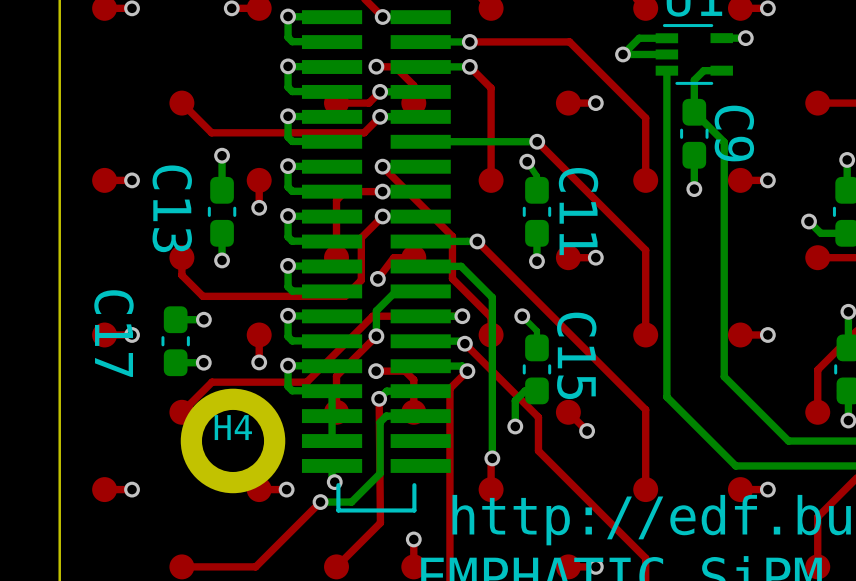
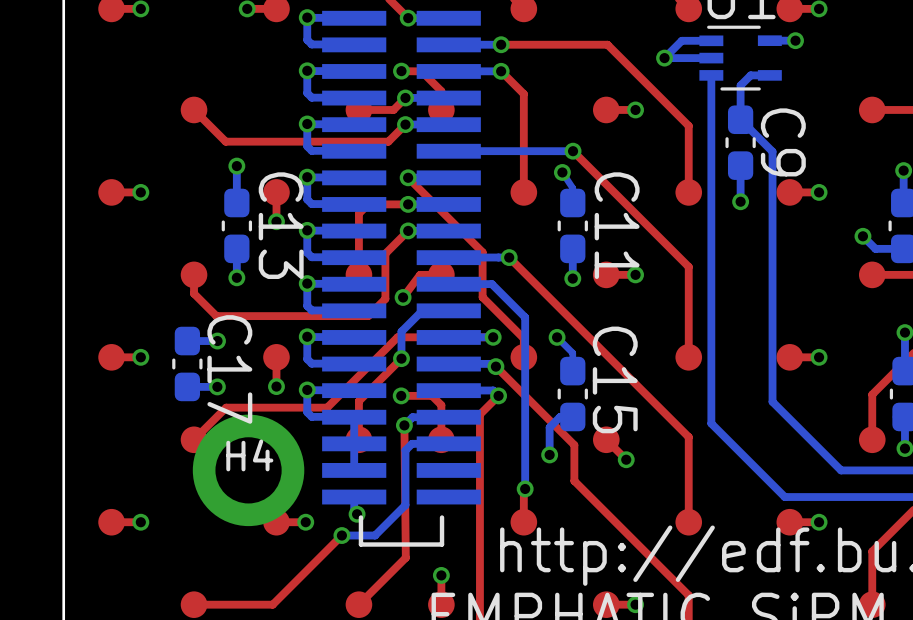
C13 name position: C13 (172, 208) -> C13 (281, 225)
C17 name position: C17 (113, 333) -> C17 (229, 369)

